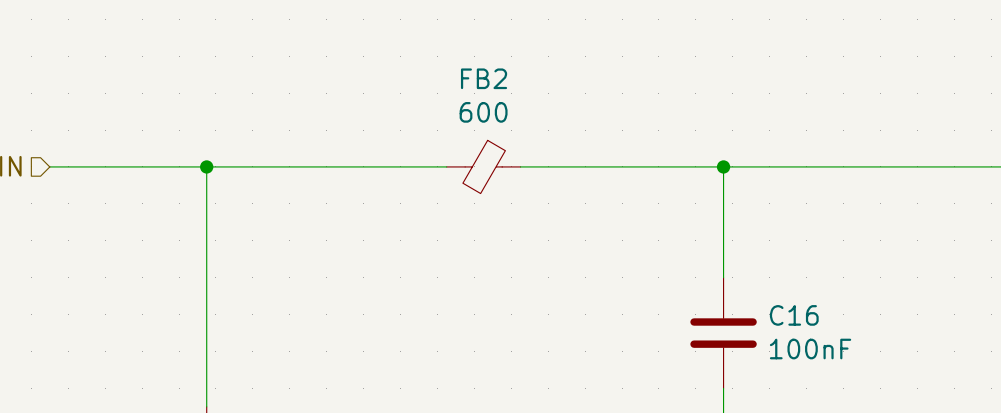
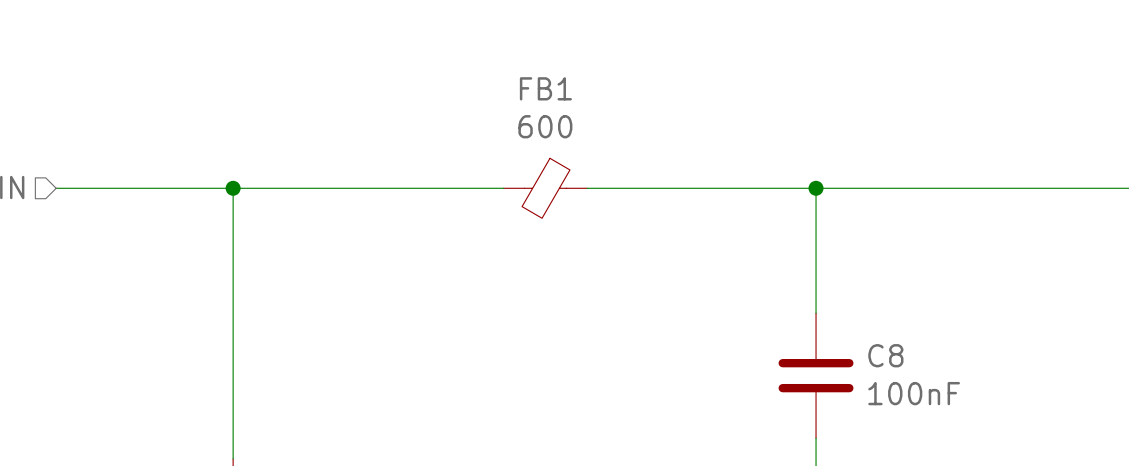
FB2 name: FB2 (484, 78) -> FB1 (545, 88)
C16 name: C16 (794, 315) -> C8 (885, 355)

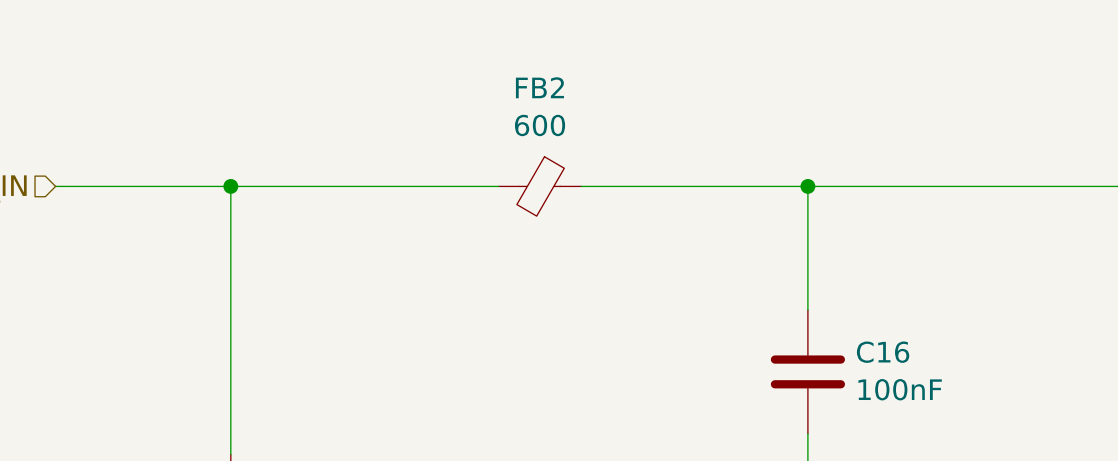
FB1 name: FB1 (545, 88) -> FB2 (539, 87)
C8 name: C8 (885, 355) -> C16 (883, 352)

